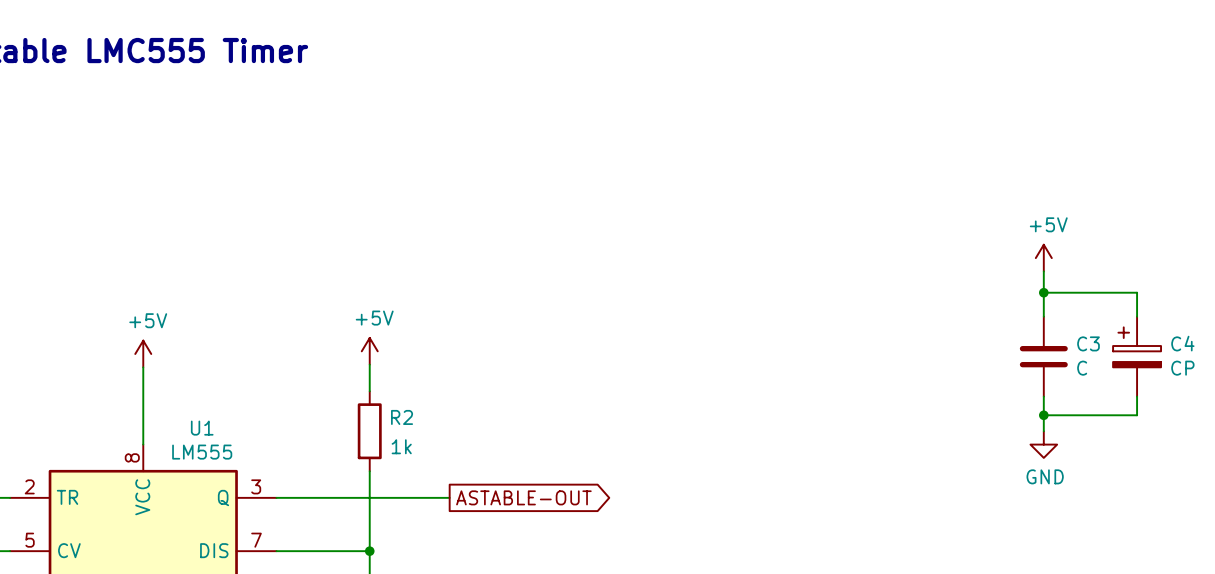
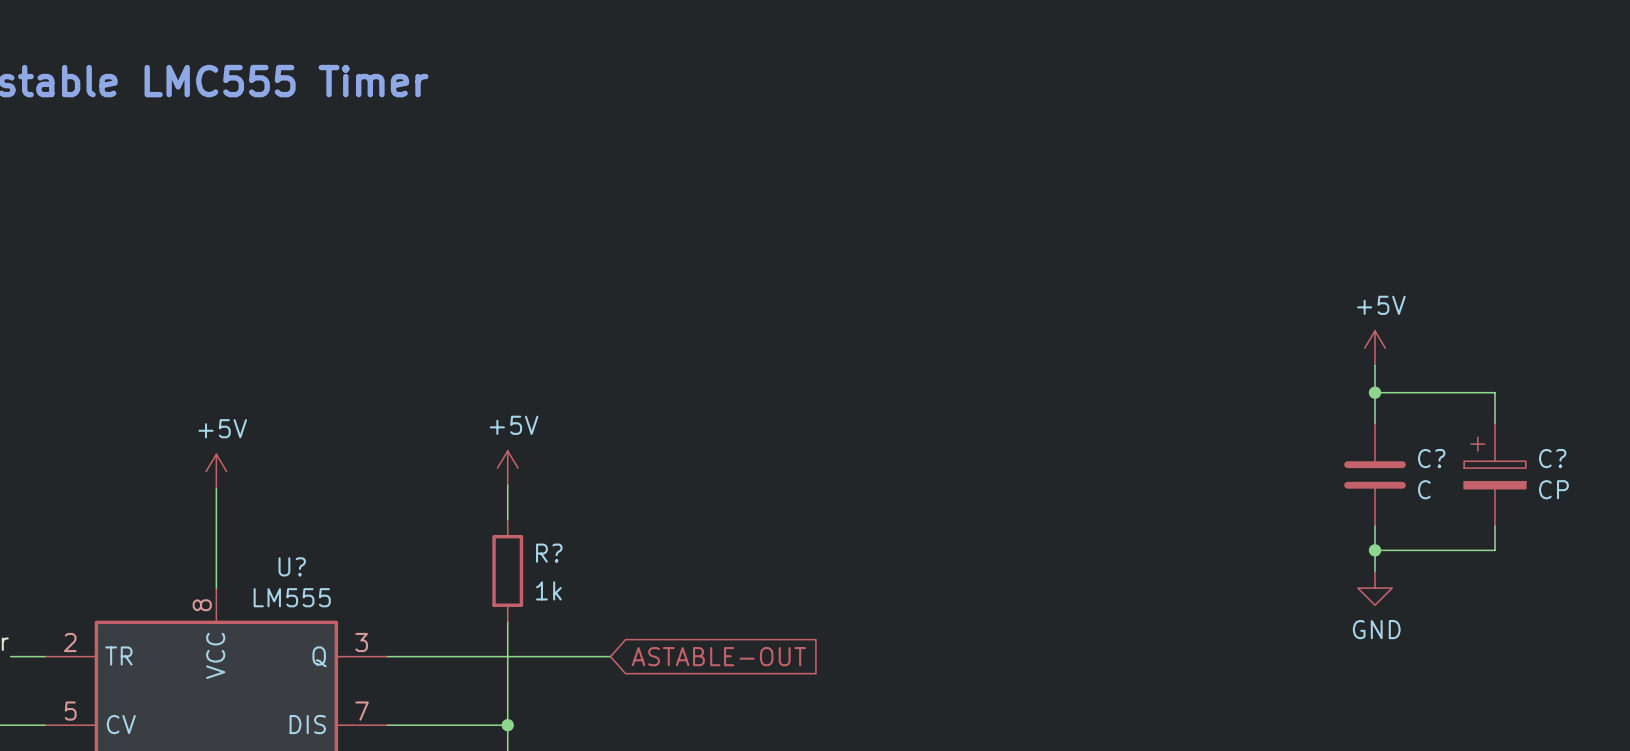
C3 name: C3 (1088, 343) -> C? (1431, 458)
C4 name: C4 (1182, 343) -> C? (1552, 458)
R2 name: R2 (402, 417) -> R? (549, 553)
U1 name: U1 (202, 428) -> U? (292, 566)
global label shape: output (523, 497) -> input (718, 656)

